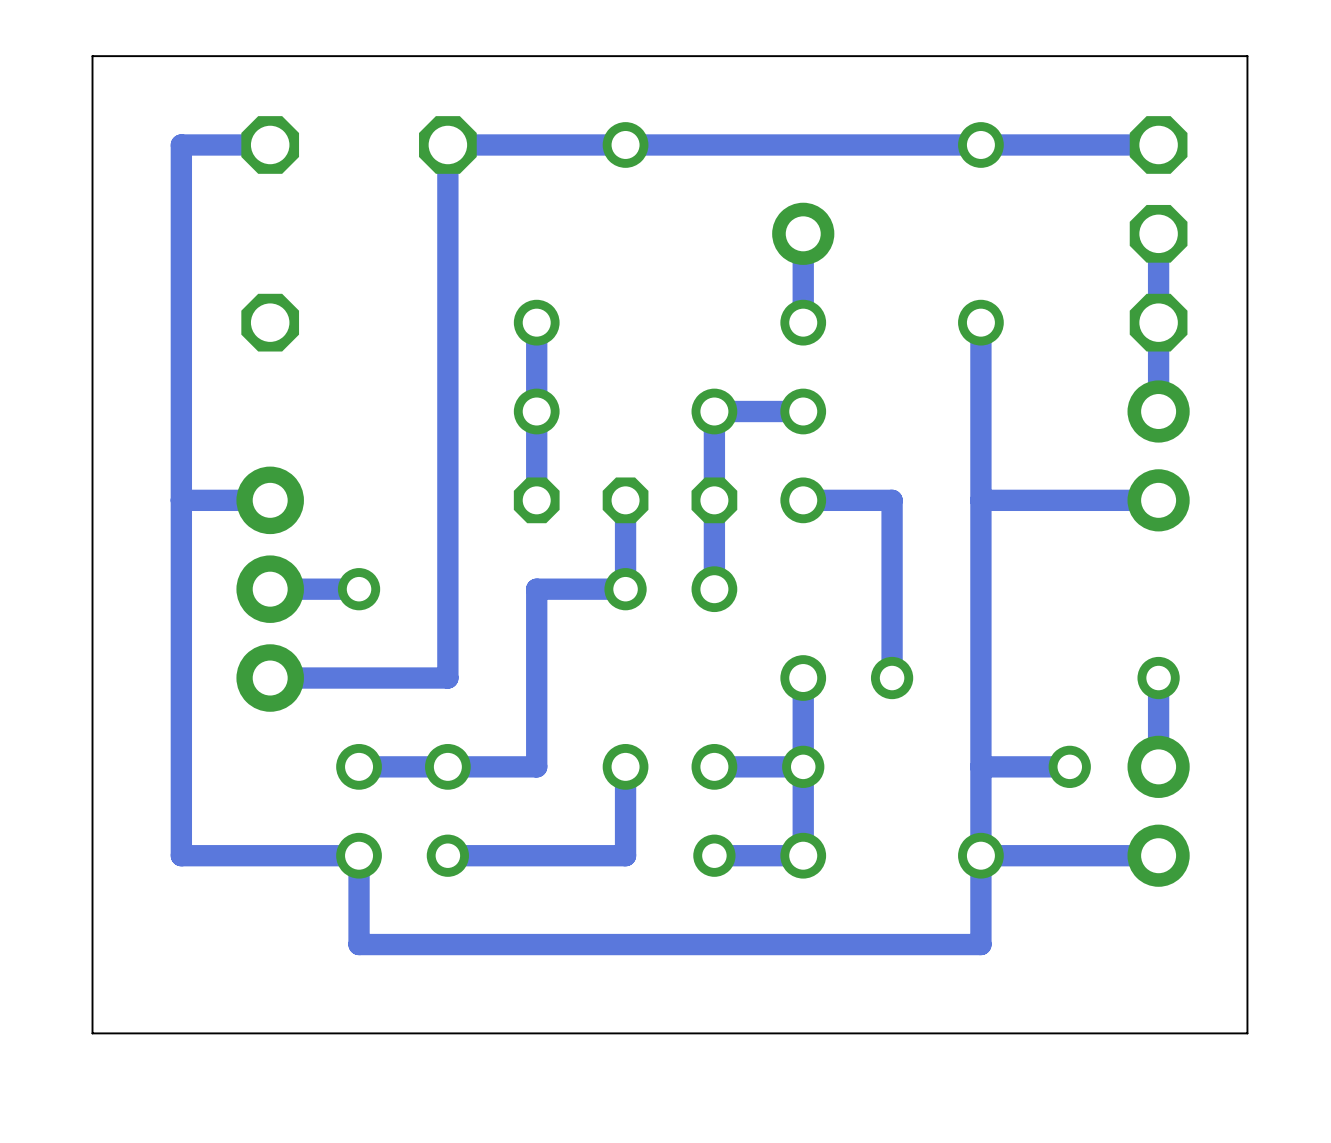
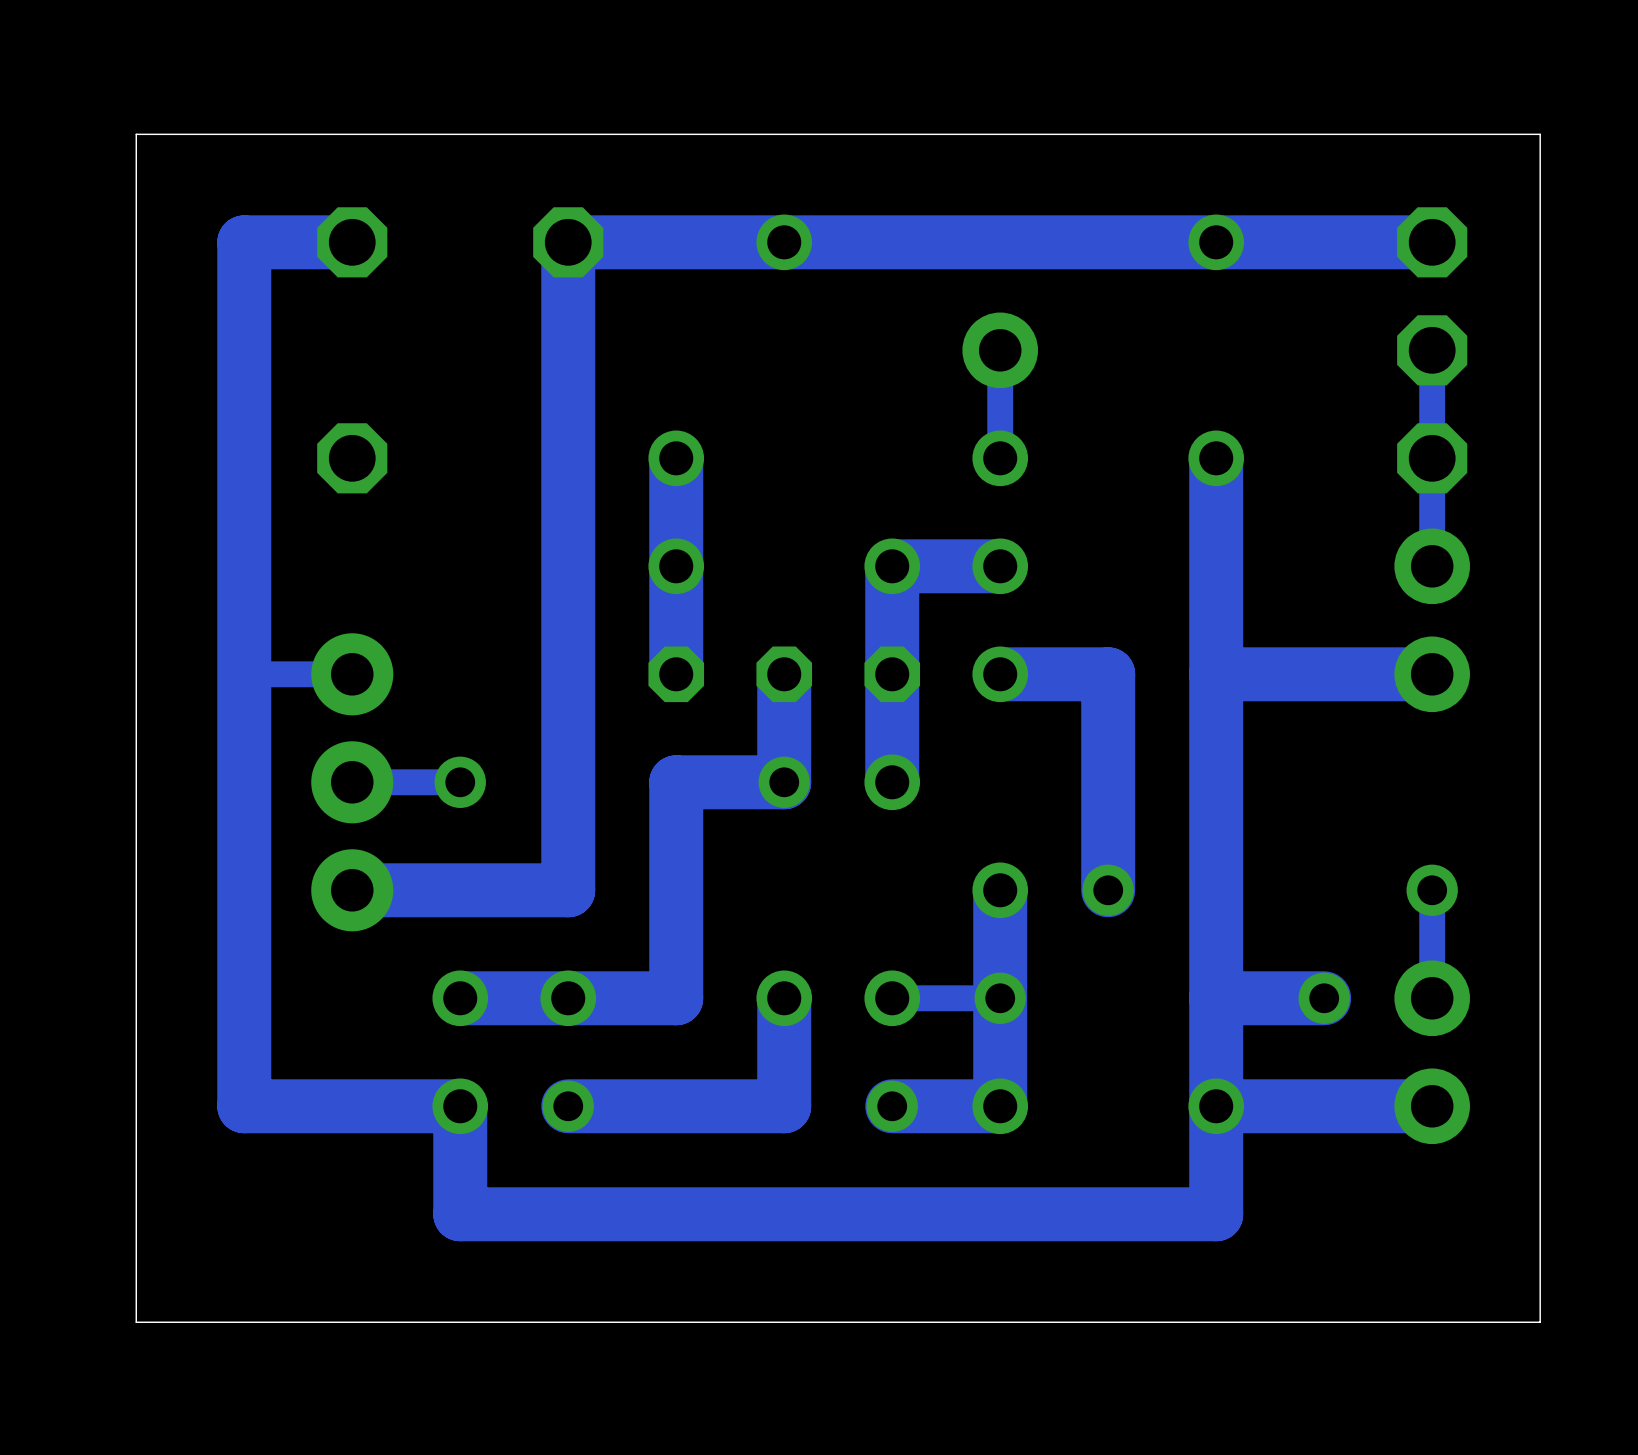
bottom track width: thin (270, 144) (181, 144) (181, 855) (359, 855) (359, 944) (980, 944) (980, 322) -> thick (352, 242) (244, 242) (244, 1106) (460, 1106) (460, 1214) (1216, 1214) (1216, 458)
bottom track width: thin (1158, 144) (447, 144) (447, 678) (270, 678) -> thick (1432, 242) (568, 242) (568, 890) (352, 890)
bottom track width: thin (536, 322) (536, 500) -> thick (676, 458) (676, 674)
bottom track width: thin (803, 411) (714, 411) (714, 589) -> thick (1000, 566) (892, 566) (892, 782)
bottom track width: thin (625, 500) (625, 589) (536, 589) (536, 766) (359, 766) -> thick (784, 674) (784, 782) (676, 782) (676, 998) (460, 998)
bottom track width: thin (803, 500) (892, 500) (892, 678) -> thick (1000, 674) (1108, 674) (1108, 890)
bottom track width: thin (1158, 500) (980, 500) -> thick (1432, 674) (1216, 674)
bottom track width: thin (803, 678) (803, 855) (714, 855) -> thick (1000, 890) (1000, 1106) (892, 1106)
bottom track width: thin (625, 766) (625, 855) (447, 855) -> thick (784, 998) (784, 1106) (568, 1106)
bottom track width: thin (1069, 766) (980, 766) -> thick (1324, 998) (1216, 998)
bottom track width: thin (1158, 855) (980, 855) -> thick (1432, 1106) (1216, 1106)

